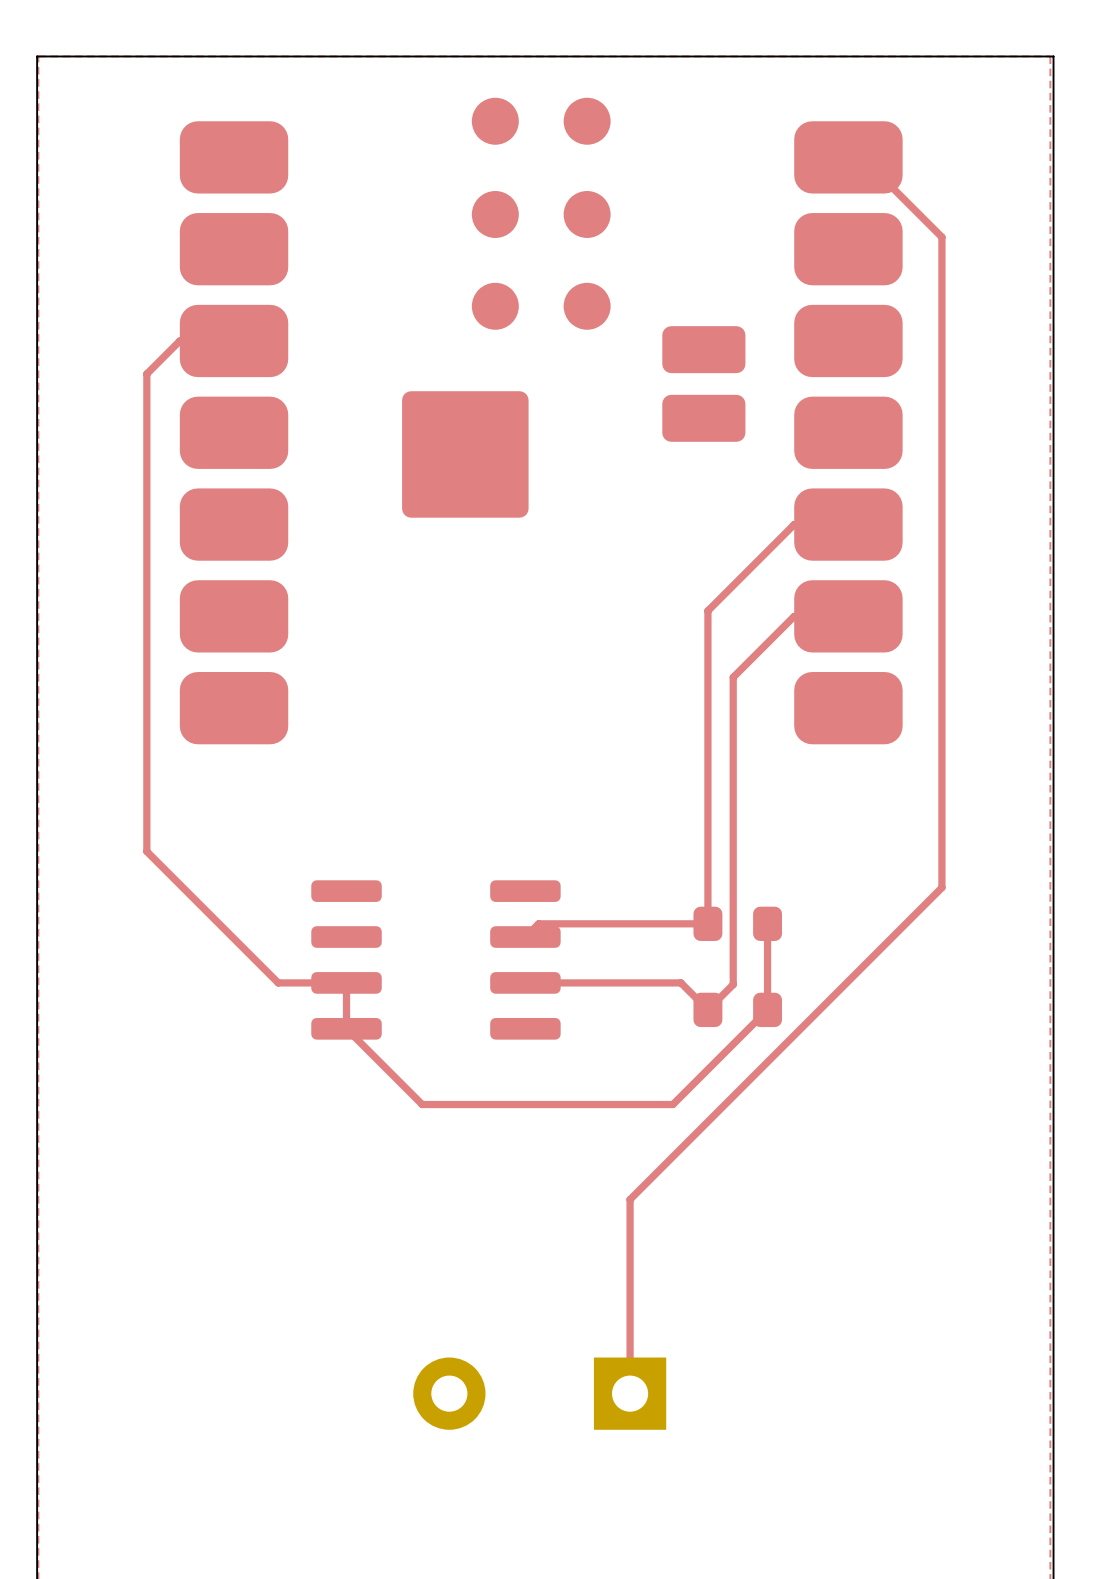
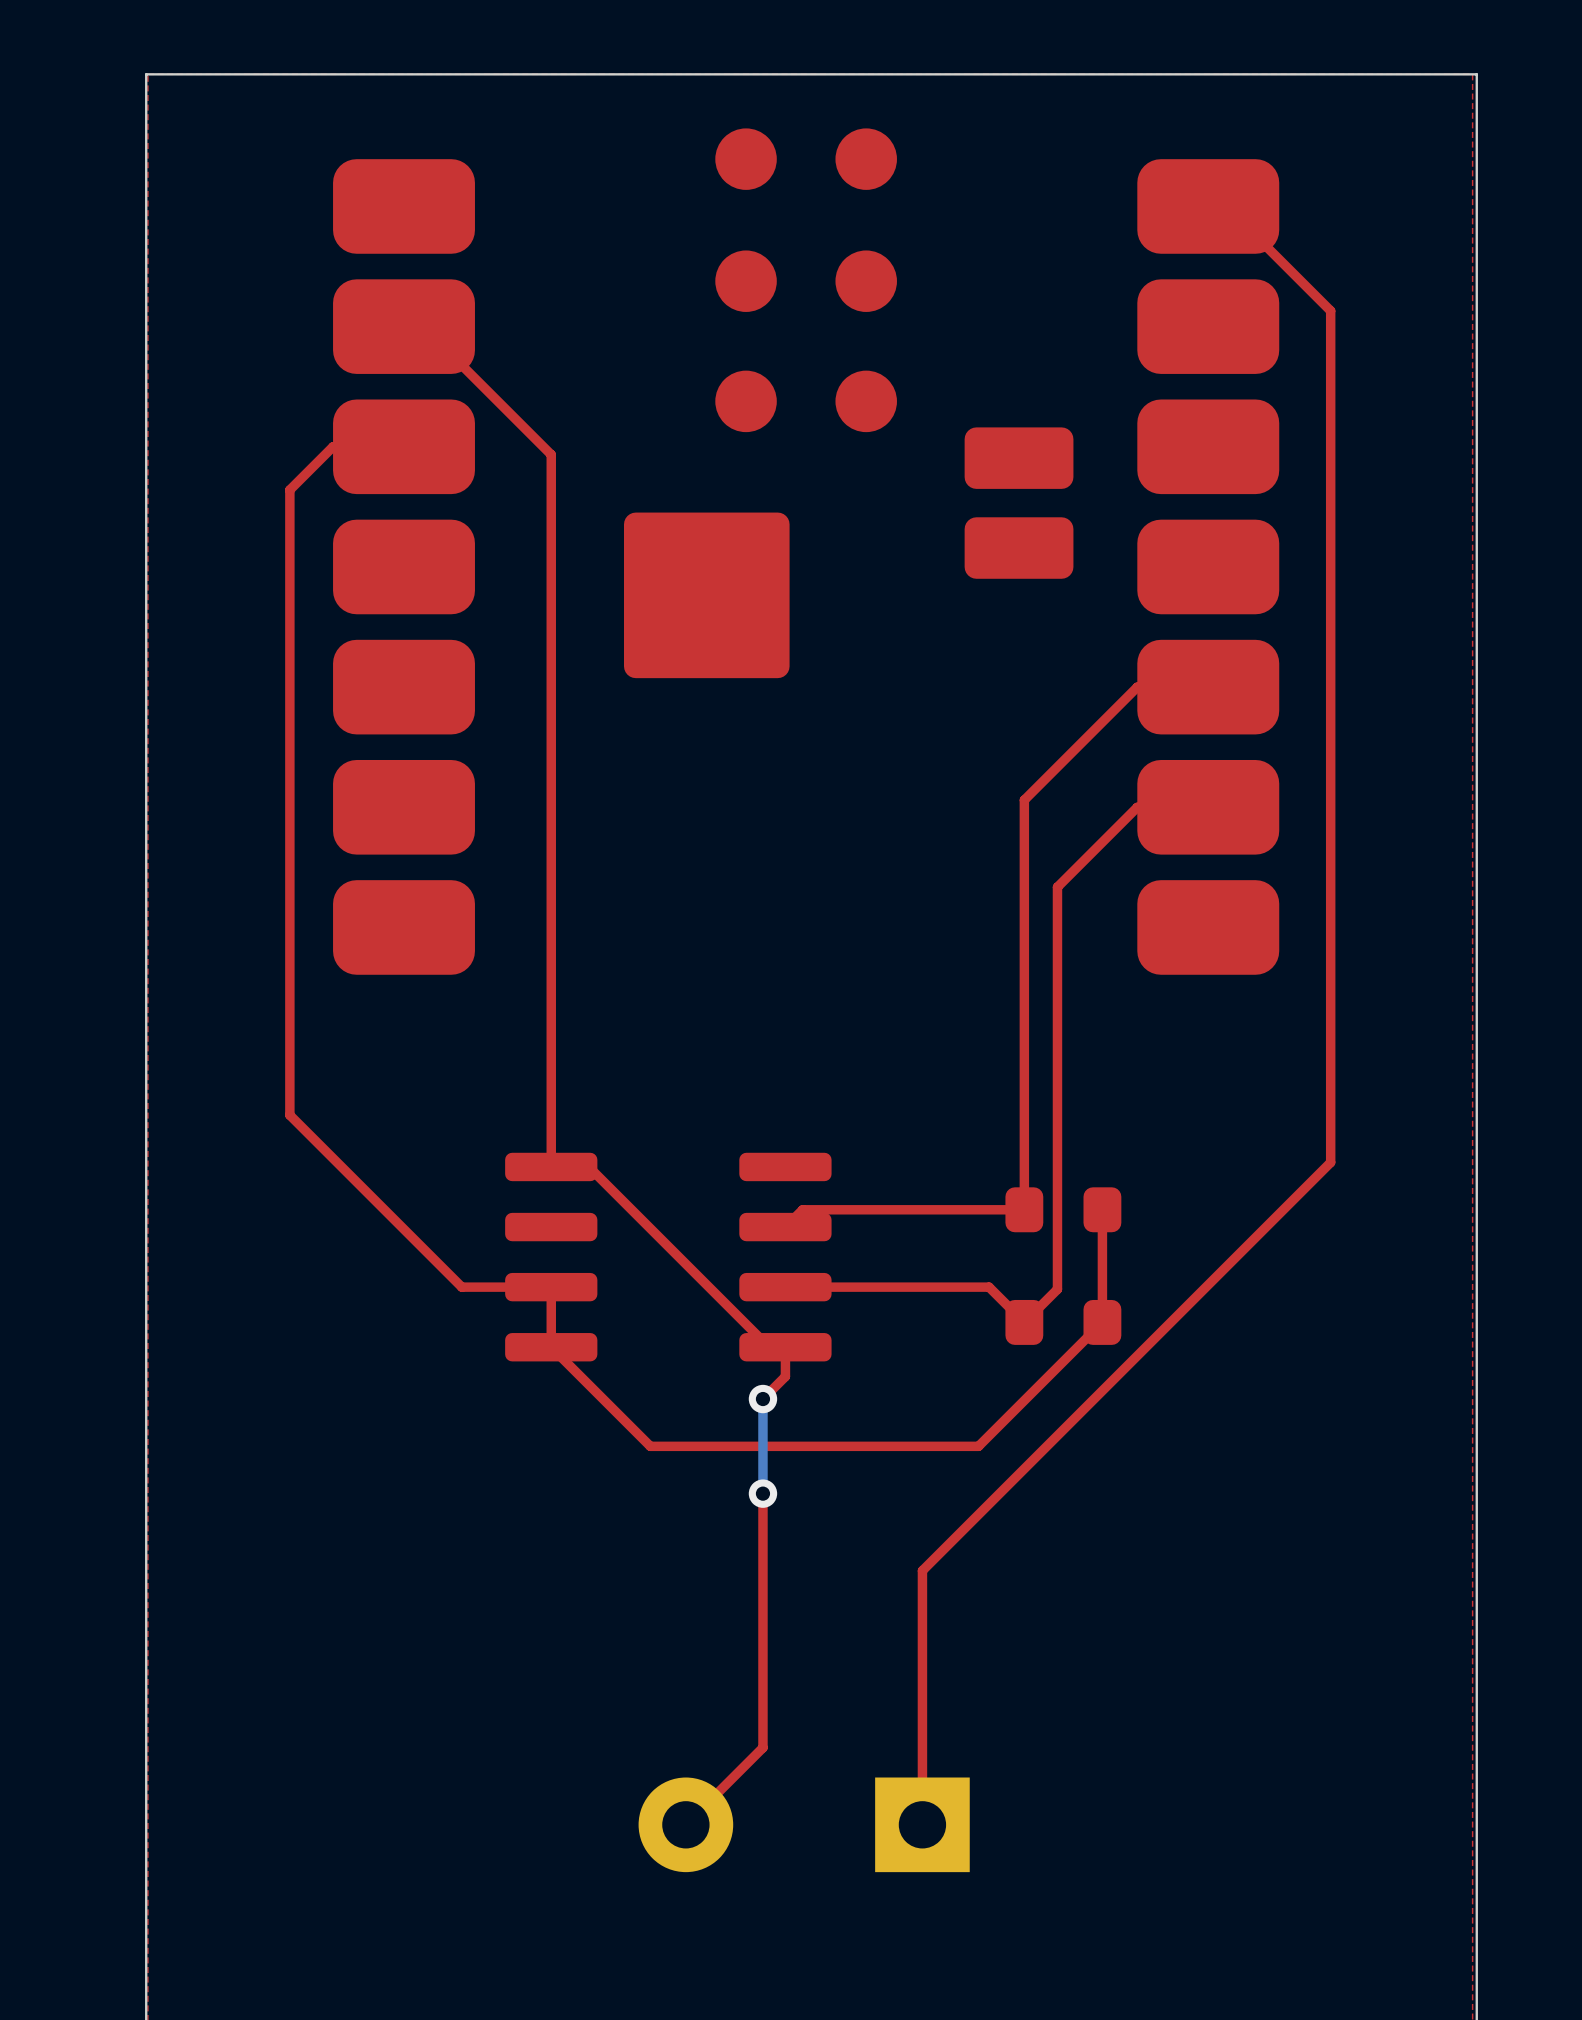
top track: none -> (404, 326) (423, 326) (551, 454) (551, 1166) (588, 1166) (769, 1347) (785, 1347) (785, 1376) (762, 1399)
bottom track: none -> (762, 1399) (762, 1493)
via: none -> (762, 1399)
top track: none -> (762, 1493) (762, 1747) (685, 1824)
via: none -> (762, 1493)

